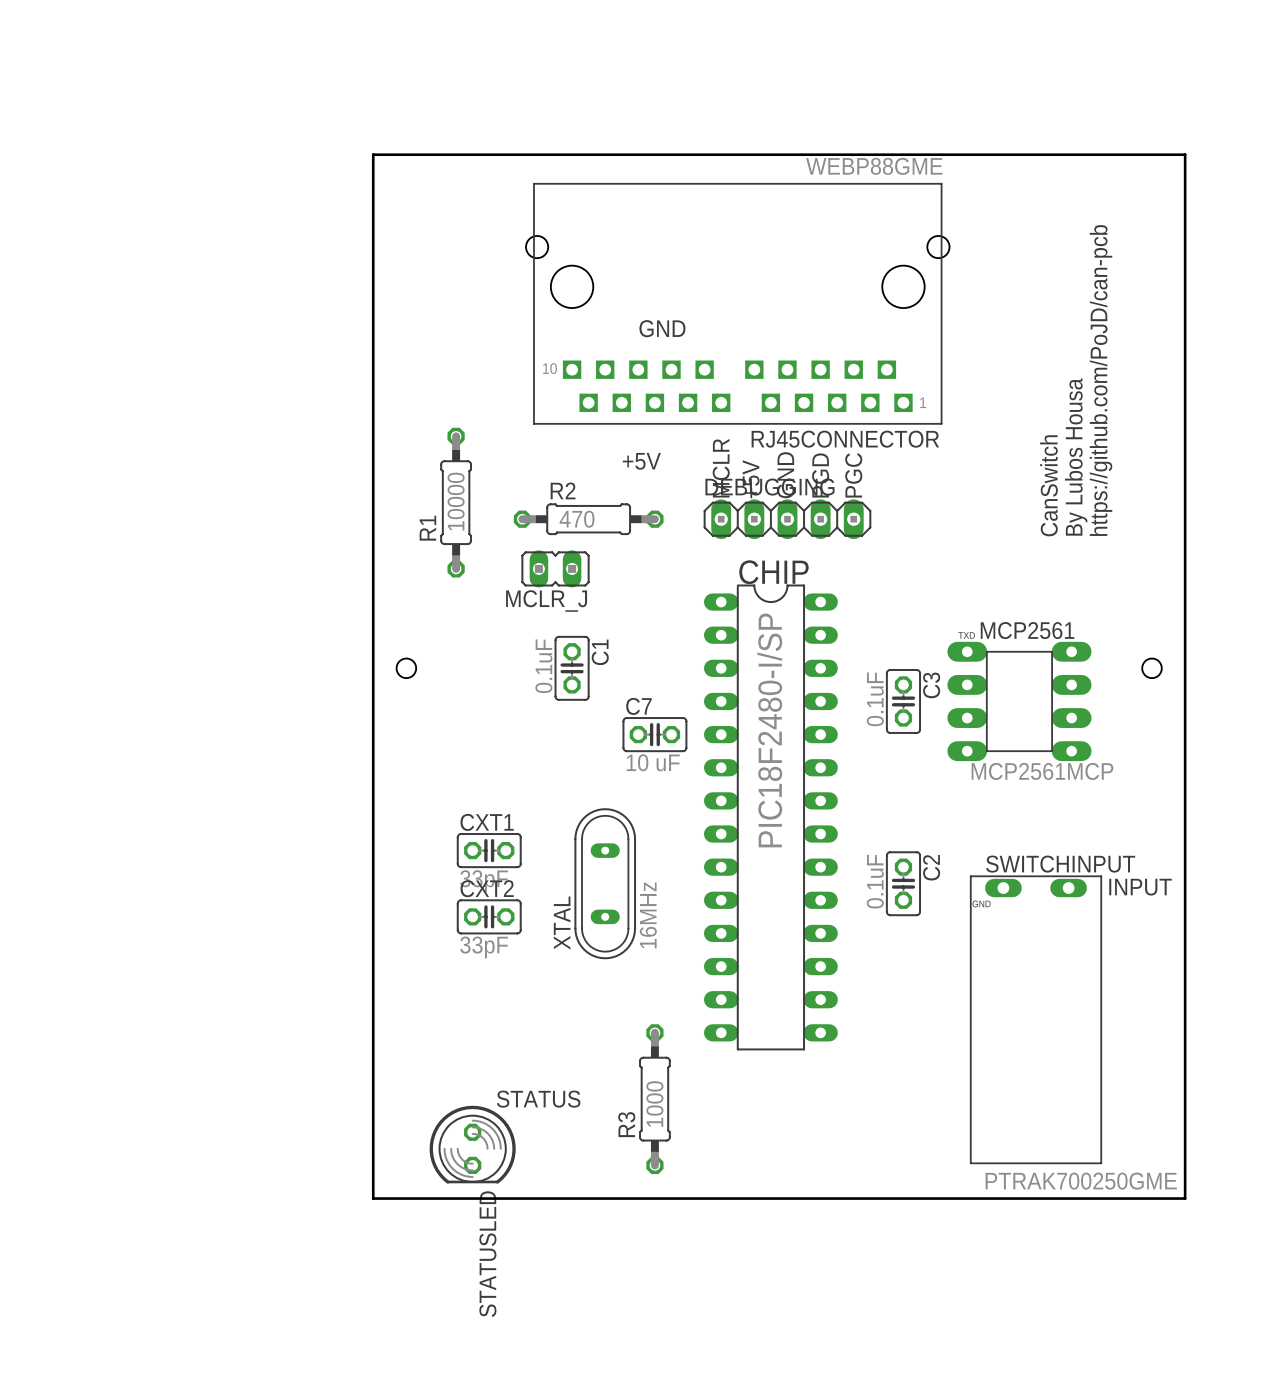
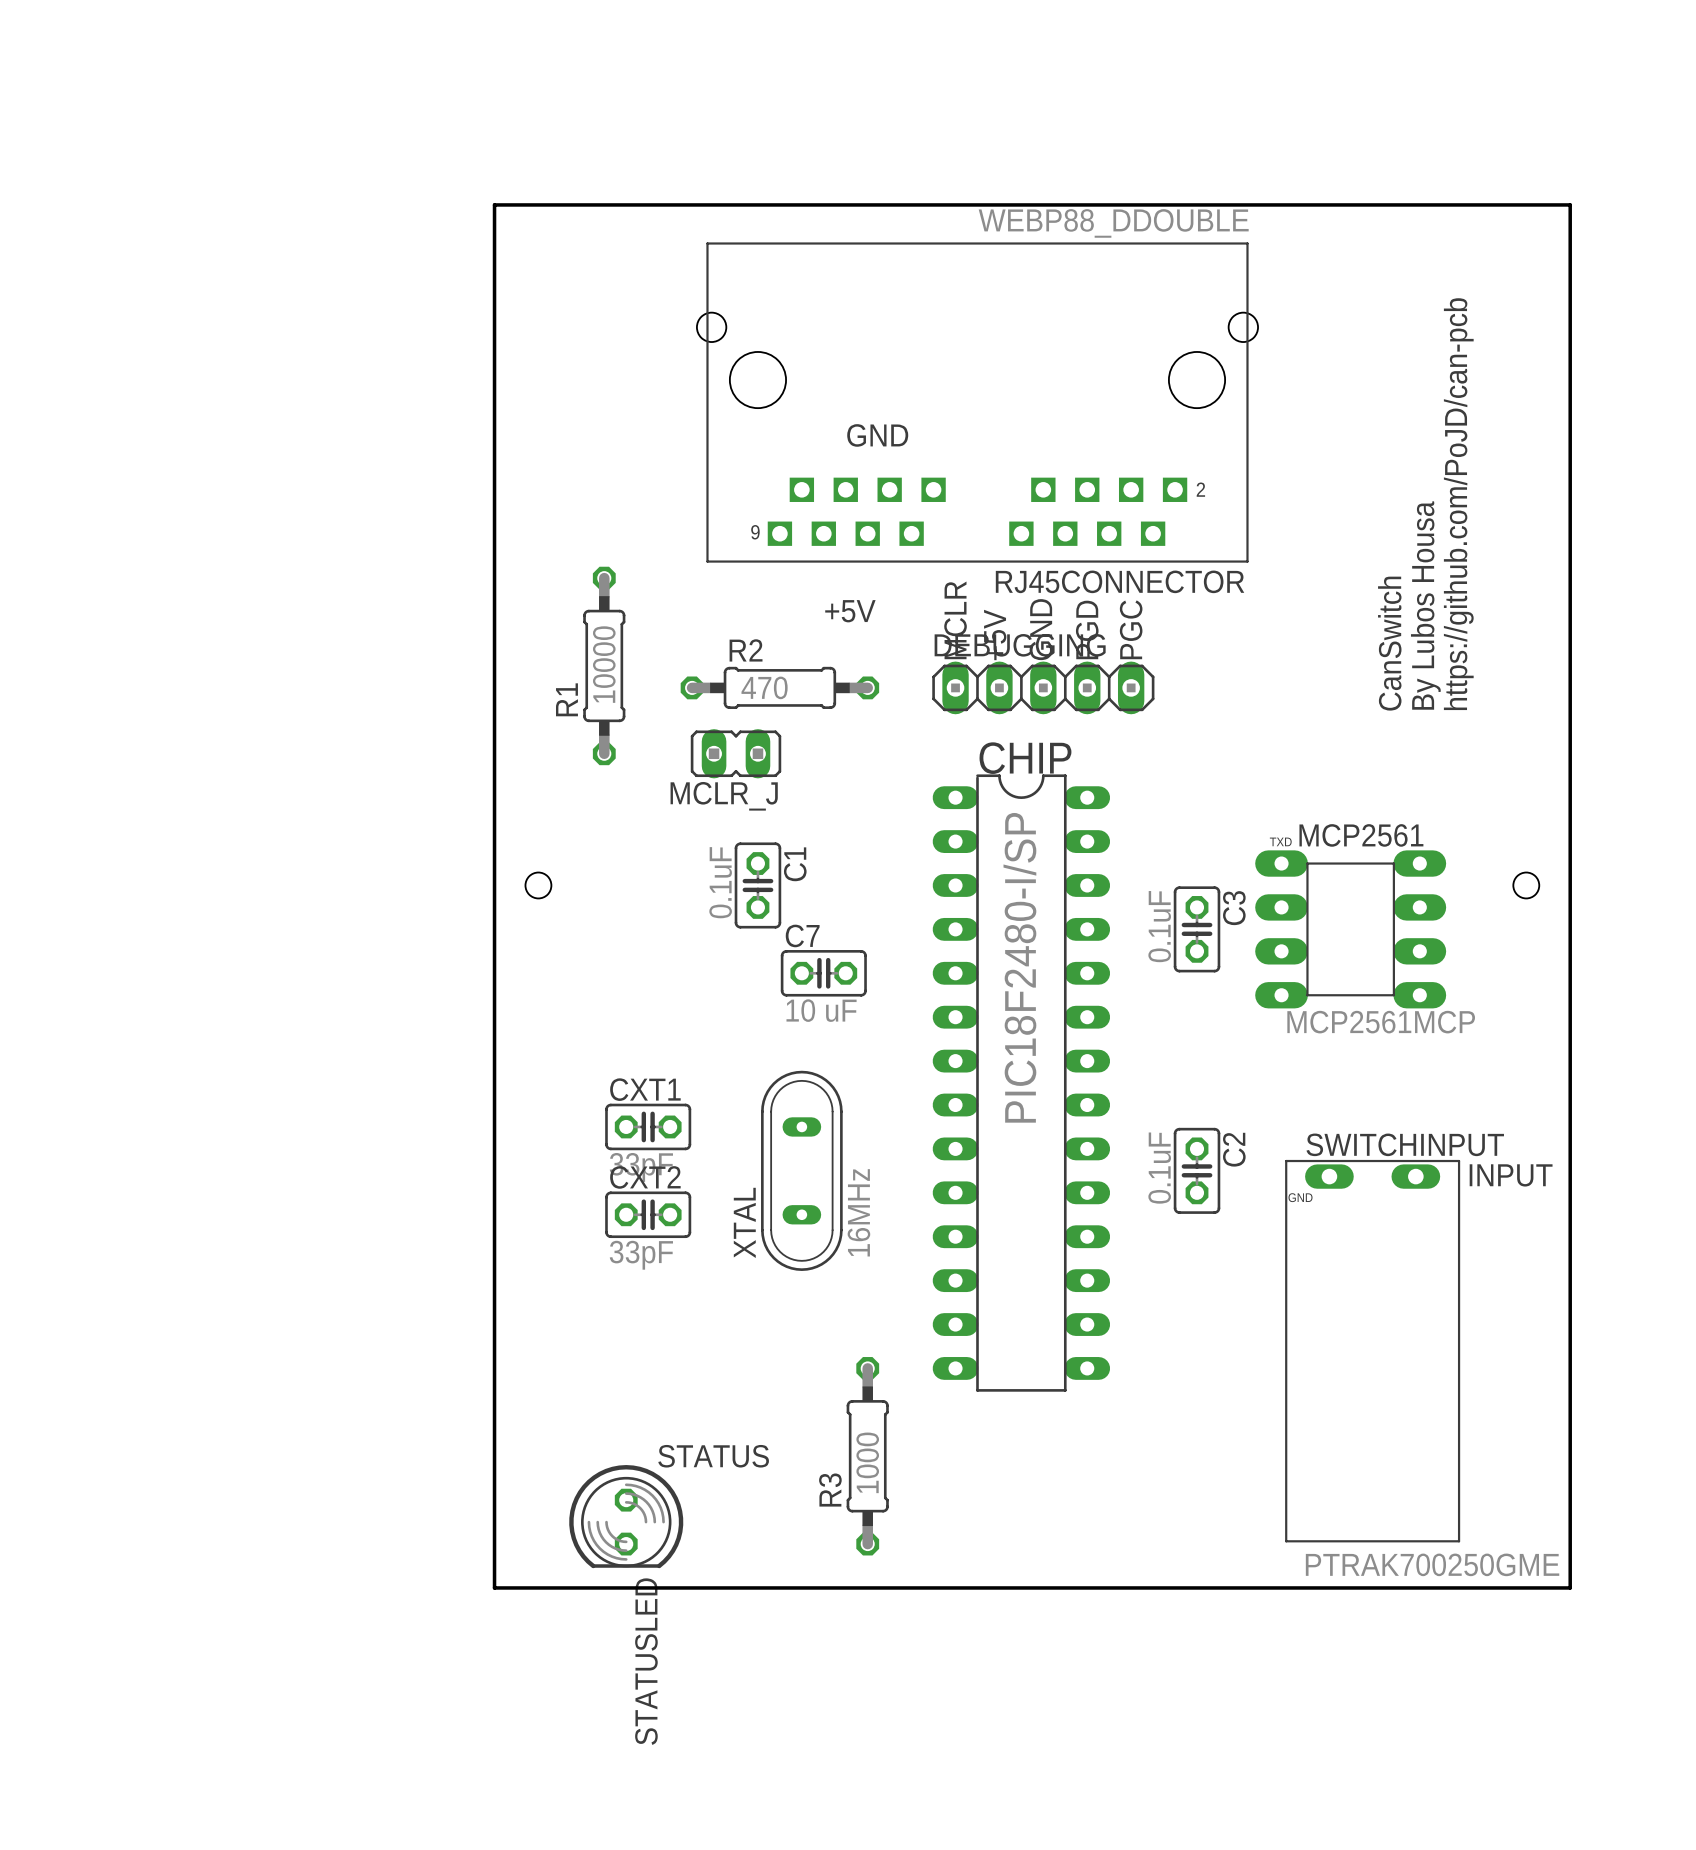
RJ45CONNECTOR value: WEBP88GME (874, 166) -> WEBP88_DDOUBLE (1113, 223)
RJ45CONNECTOR footprint: [526, 182, 950, 425] -> [696, 242, 1259, 563]
C7 position: (654, 734) -> (823, 973)

